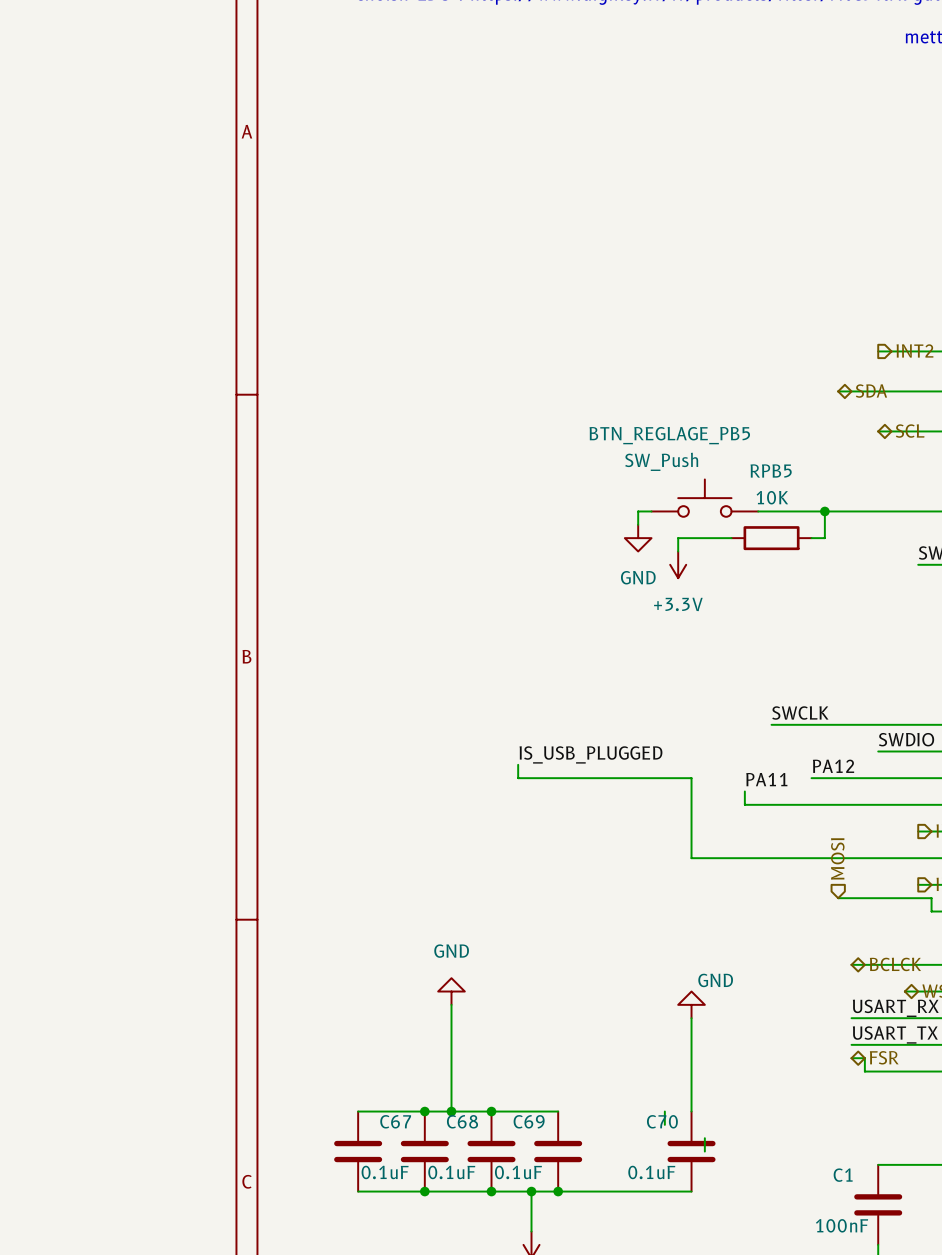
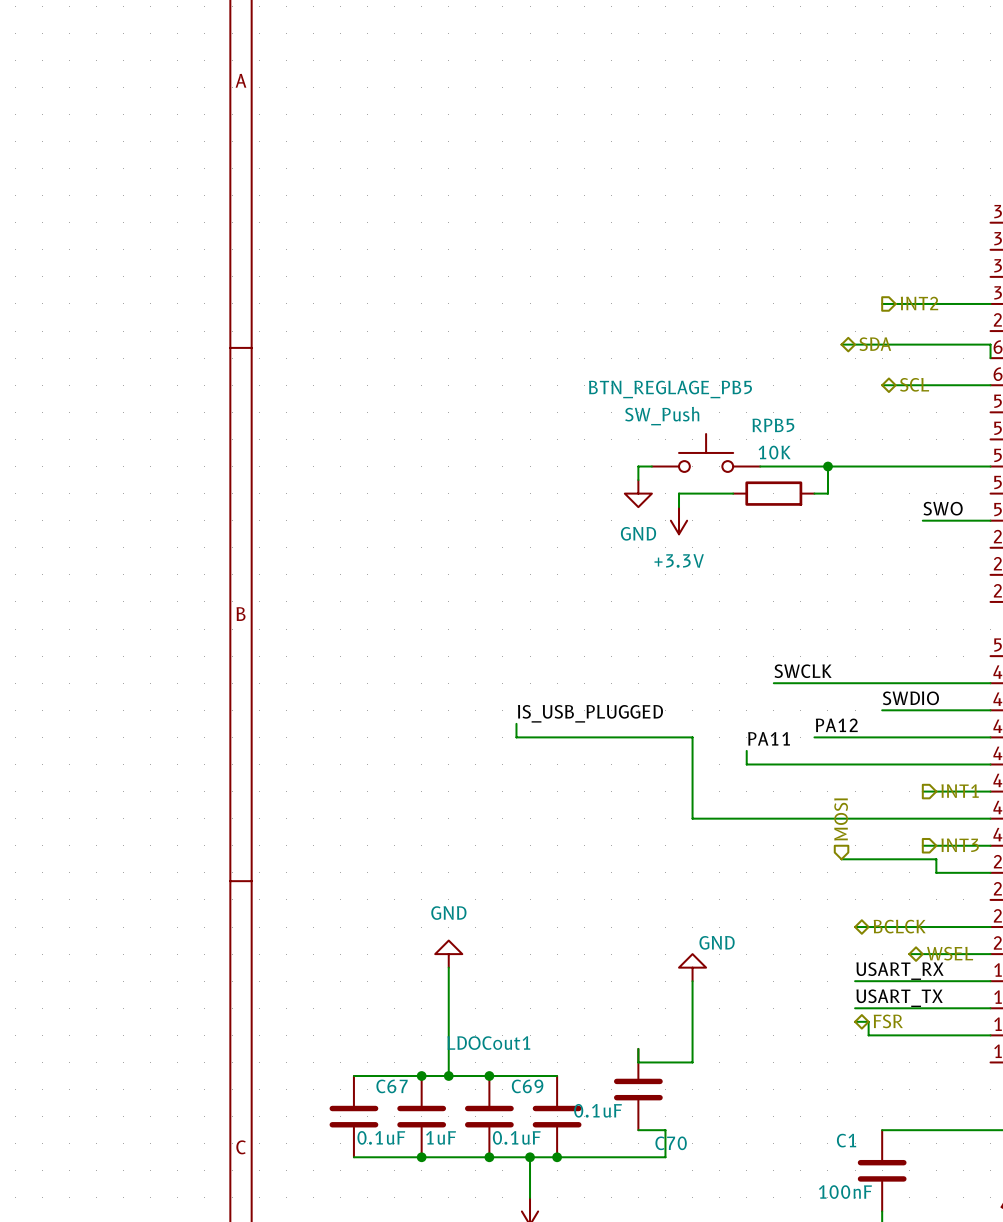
wire: (691, 1098) (691, 1111) -> (692, 1062) (638, 1062) (638, 1048)
wire: (664, 1111) (664, 1124) -> none
C68 name: C68 (462, 1121) -> LDOCout1 (488, 1043)
C70 name position: C70 (662, 1121) -> C70 (671, 1143)
wire: (704, 1138) (704, 1151) -> none
C70 position: (691, 1151) -> (638, 1089)
C68 value: 0.1uF (451, 1172) -> 1uF (441, 1137)
wire: (664, 1191) (691, 1191) -> (665, 1157) (665, 1130) (638, 1130)

